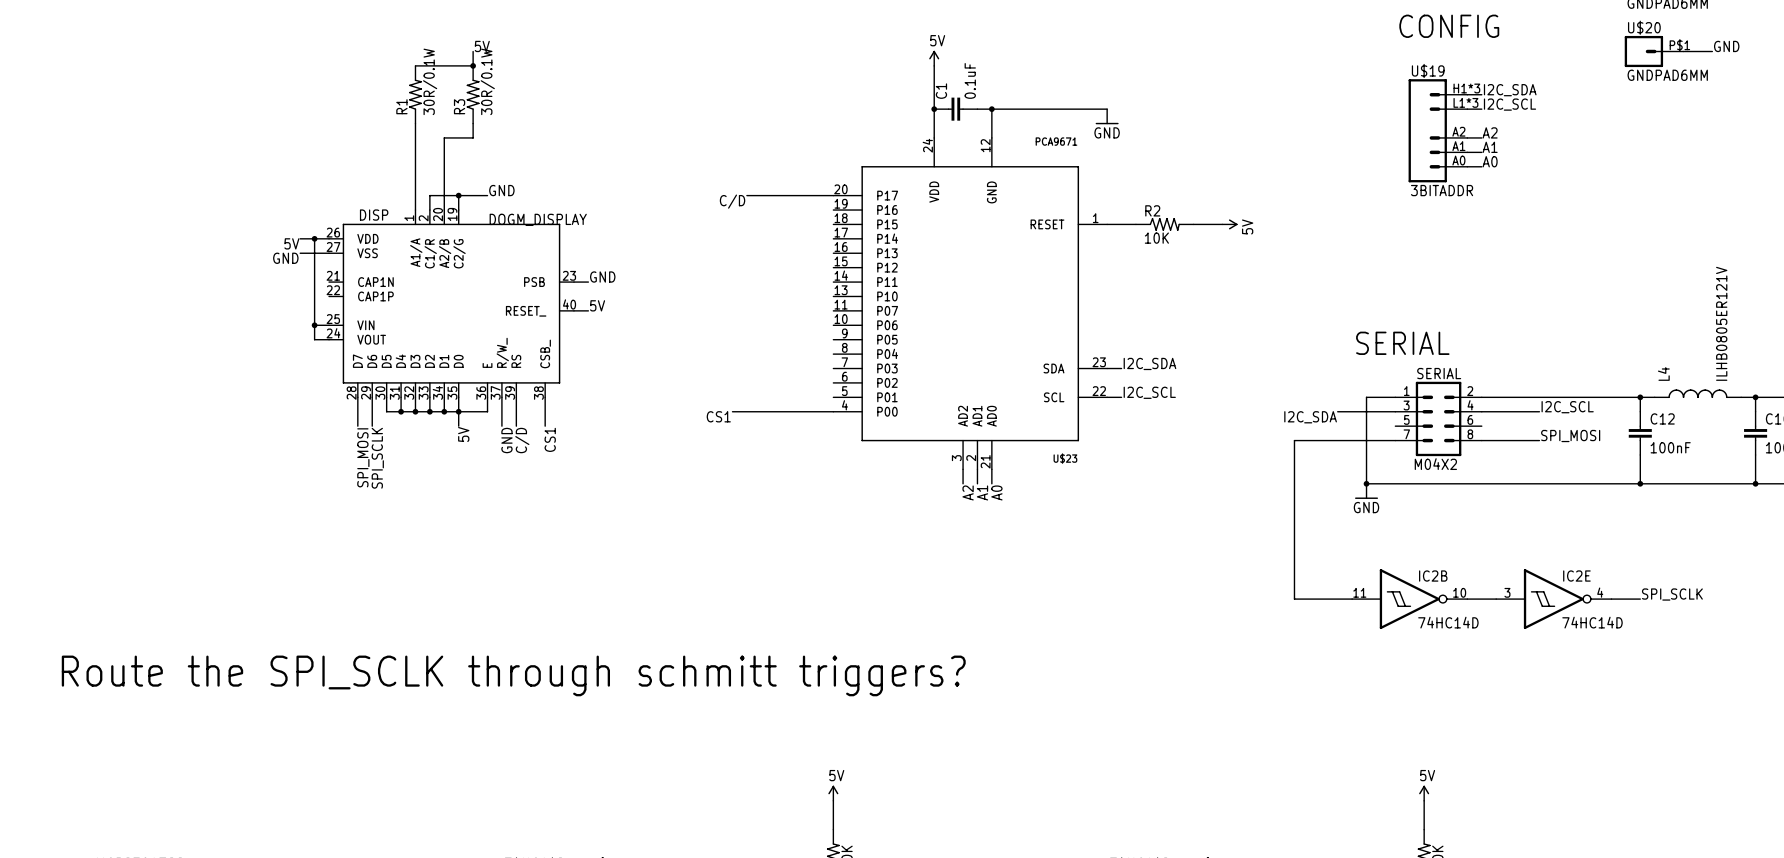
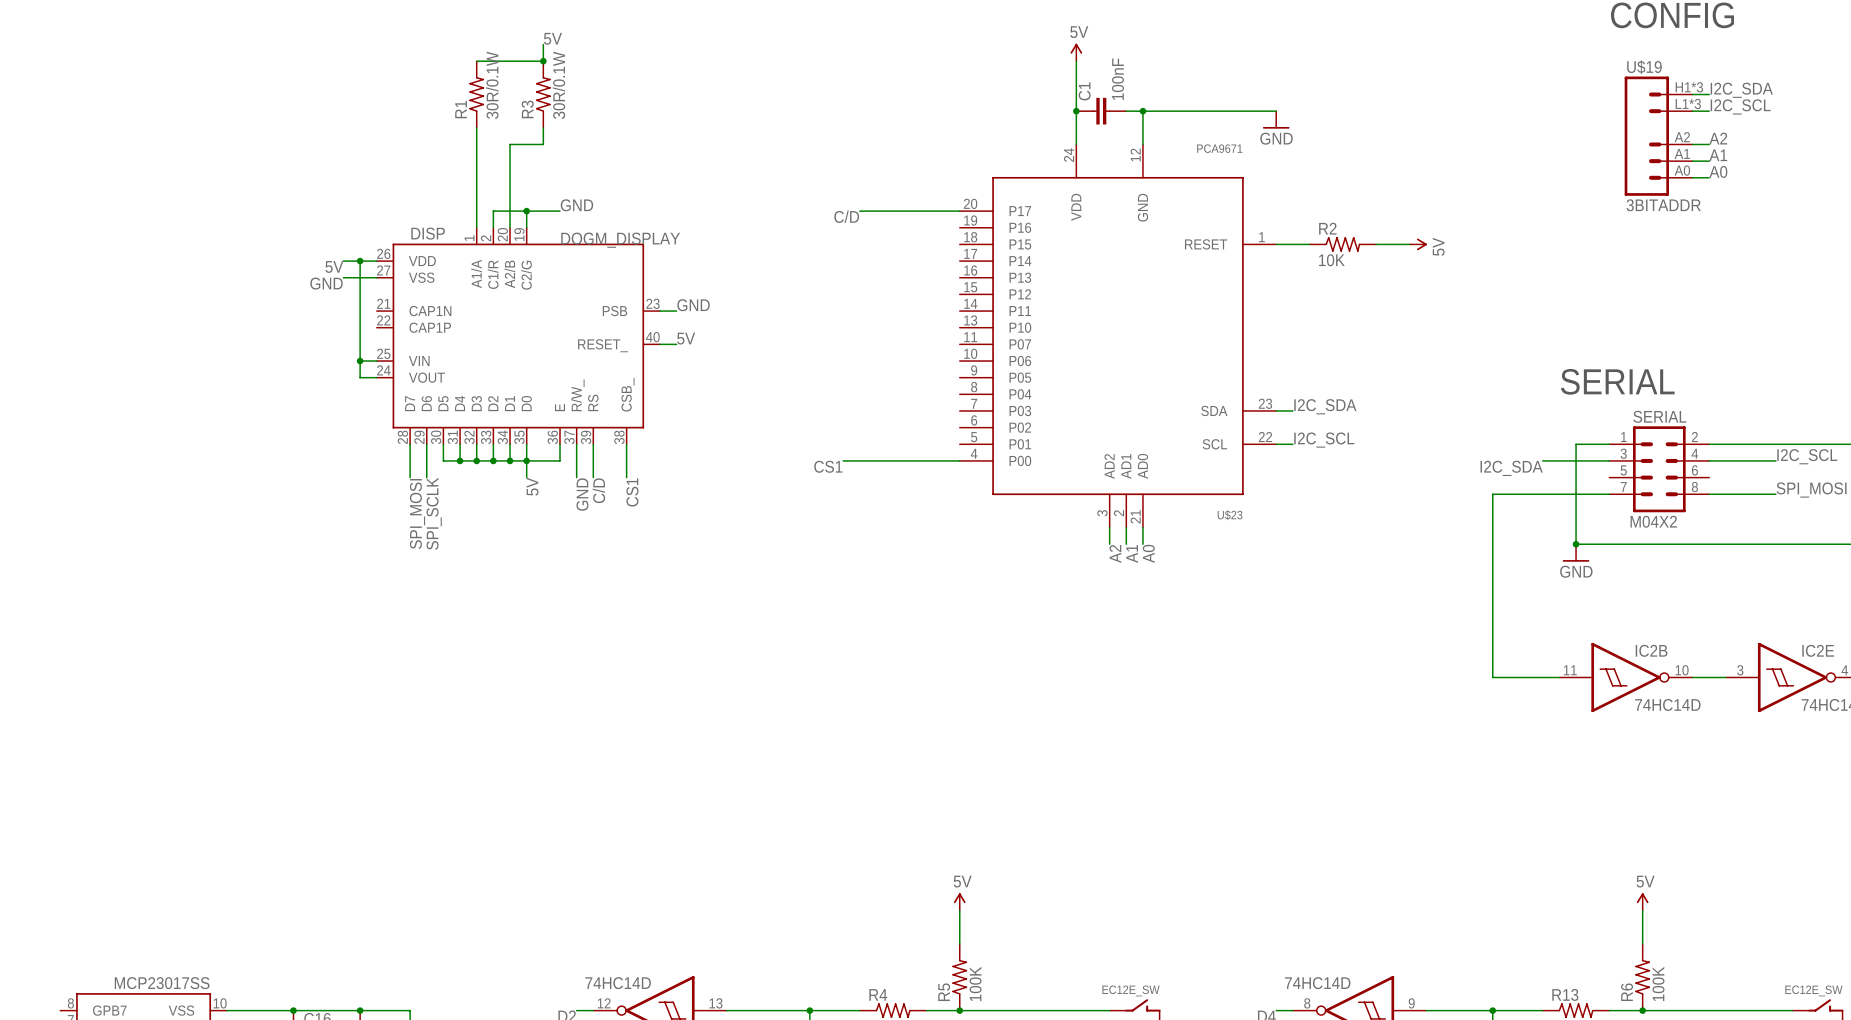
C1 value: 0.1uF (970, 80) -> 100nF (1117, 79)
text: Route the SPI_SCLK through schmitt triggers? (513, 675) -> none

